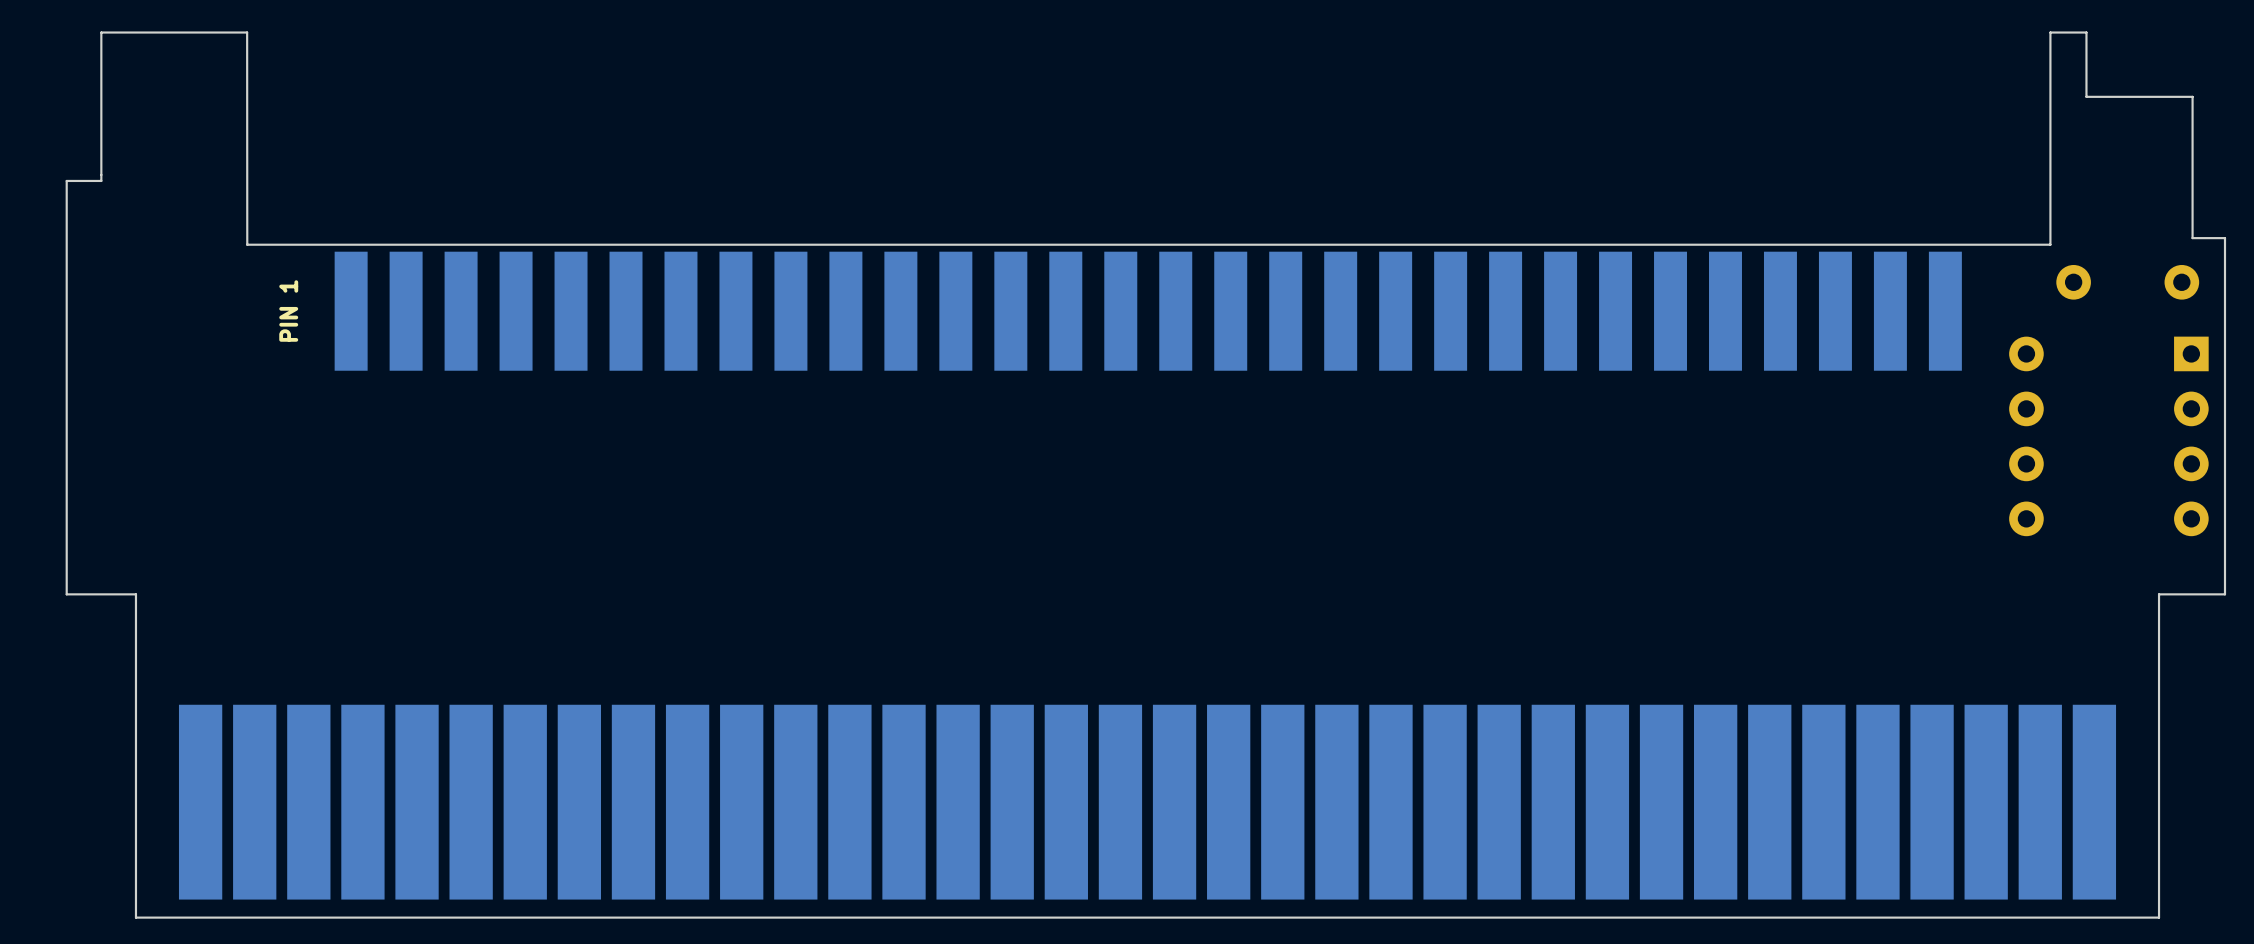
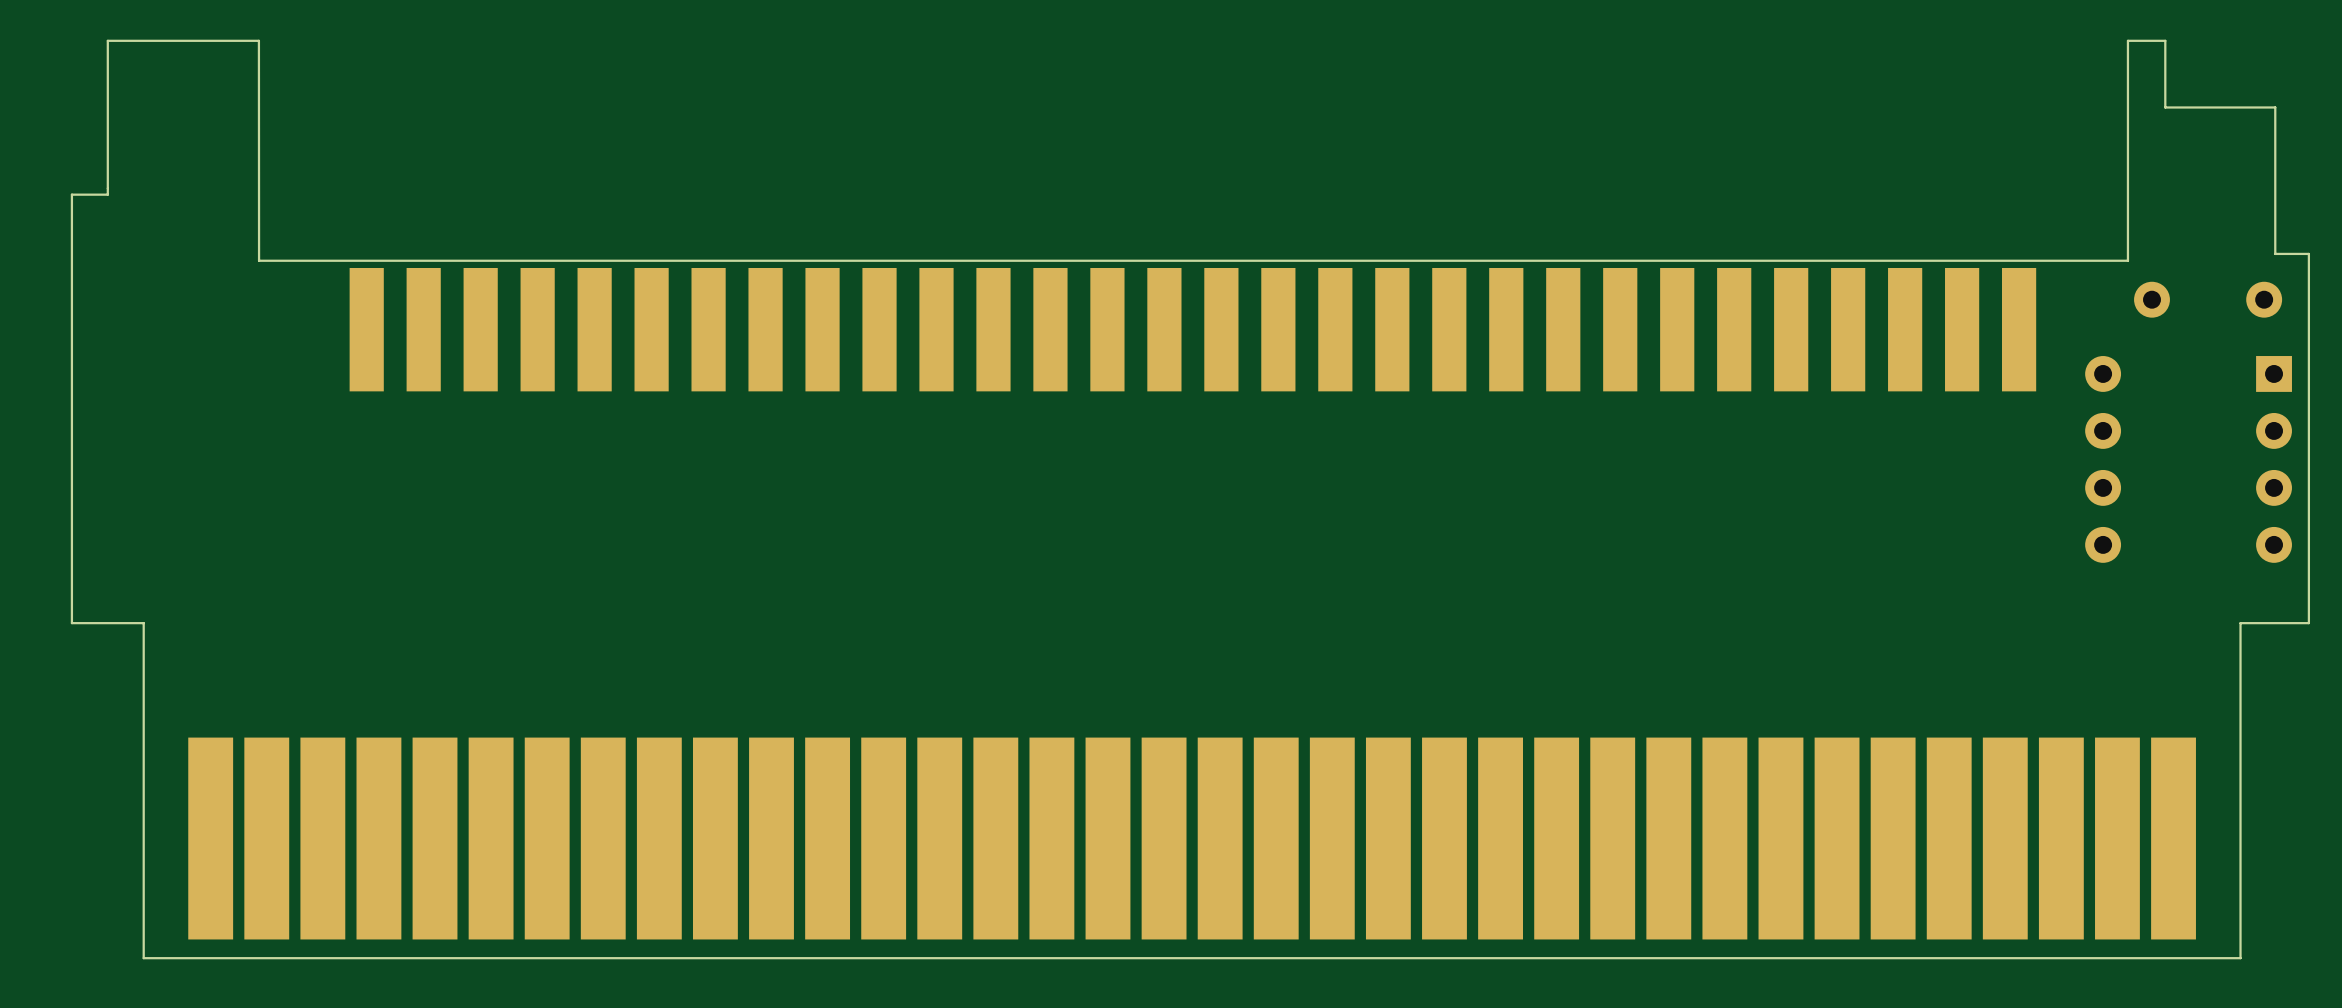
text: PIN 1 (288, 311) -> none

